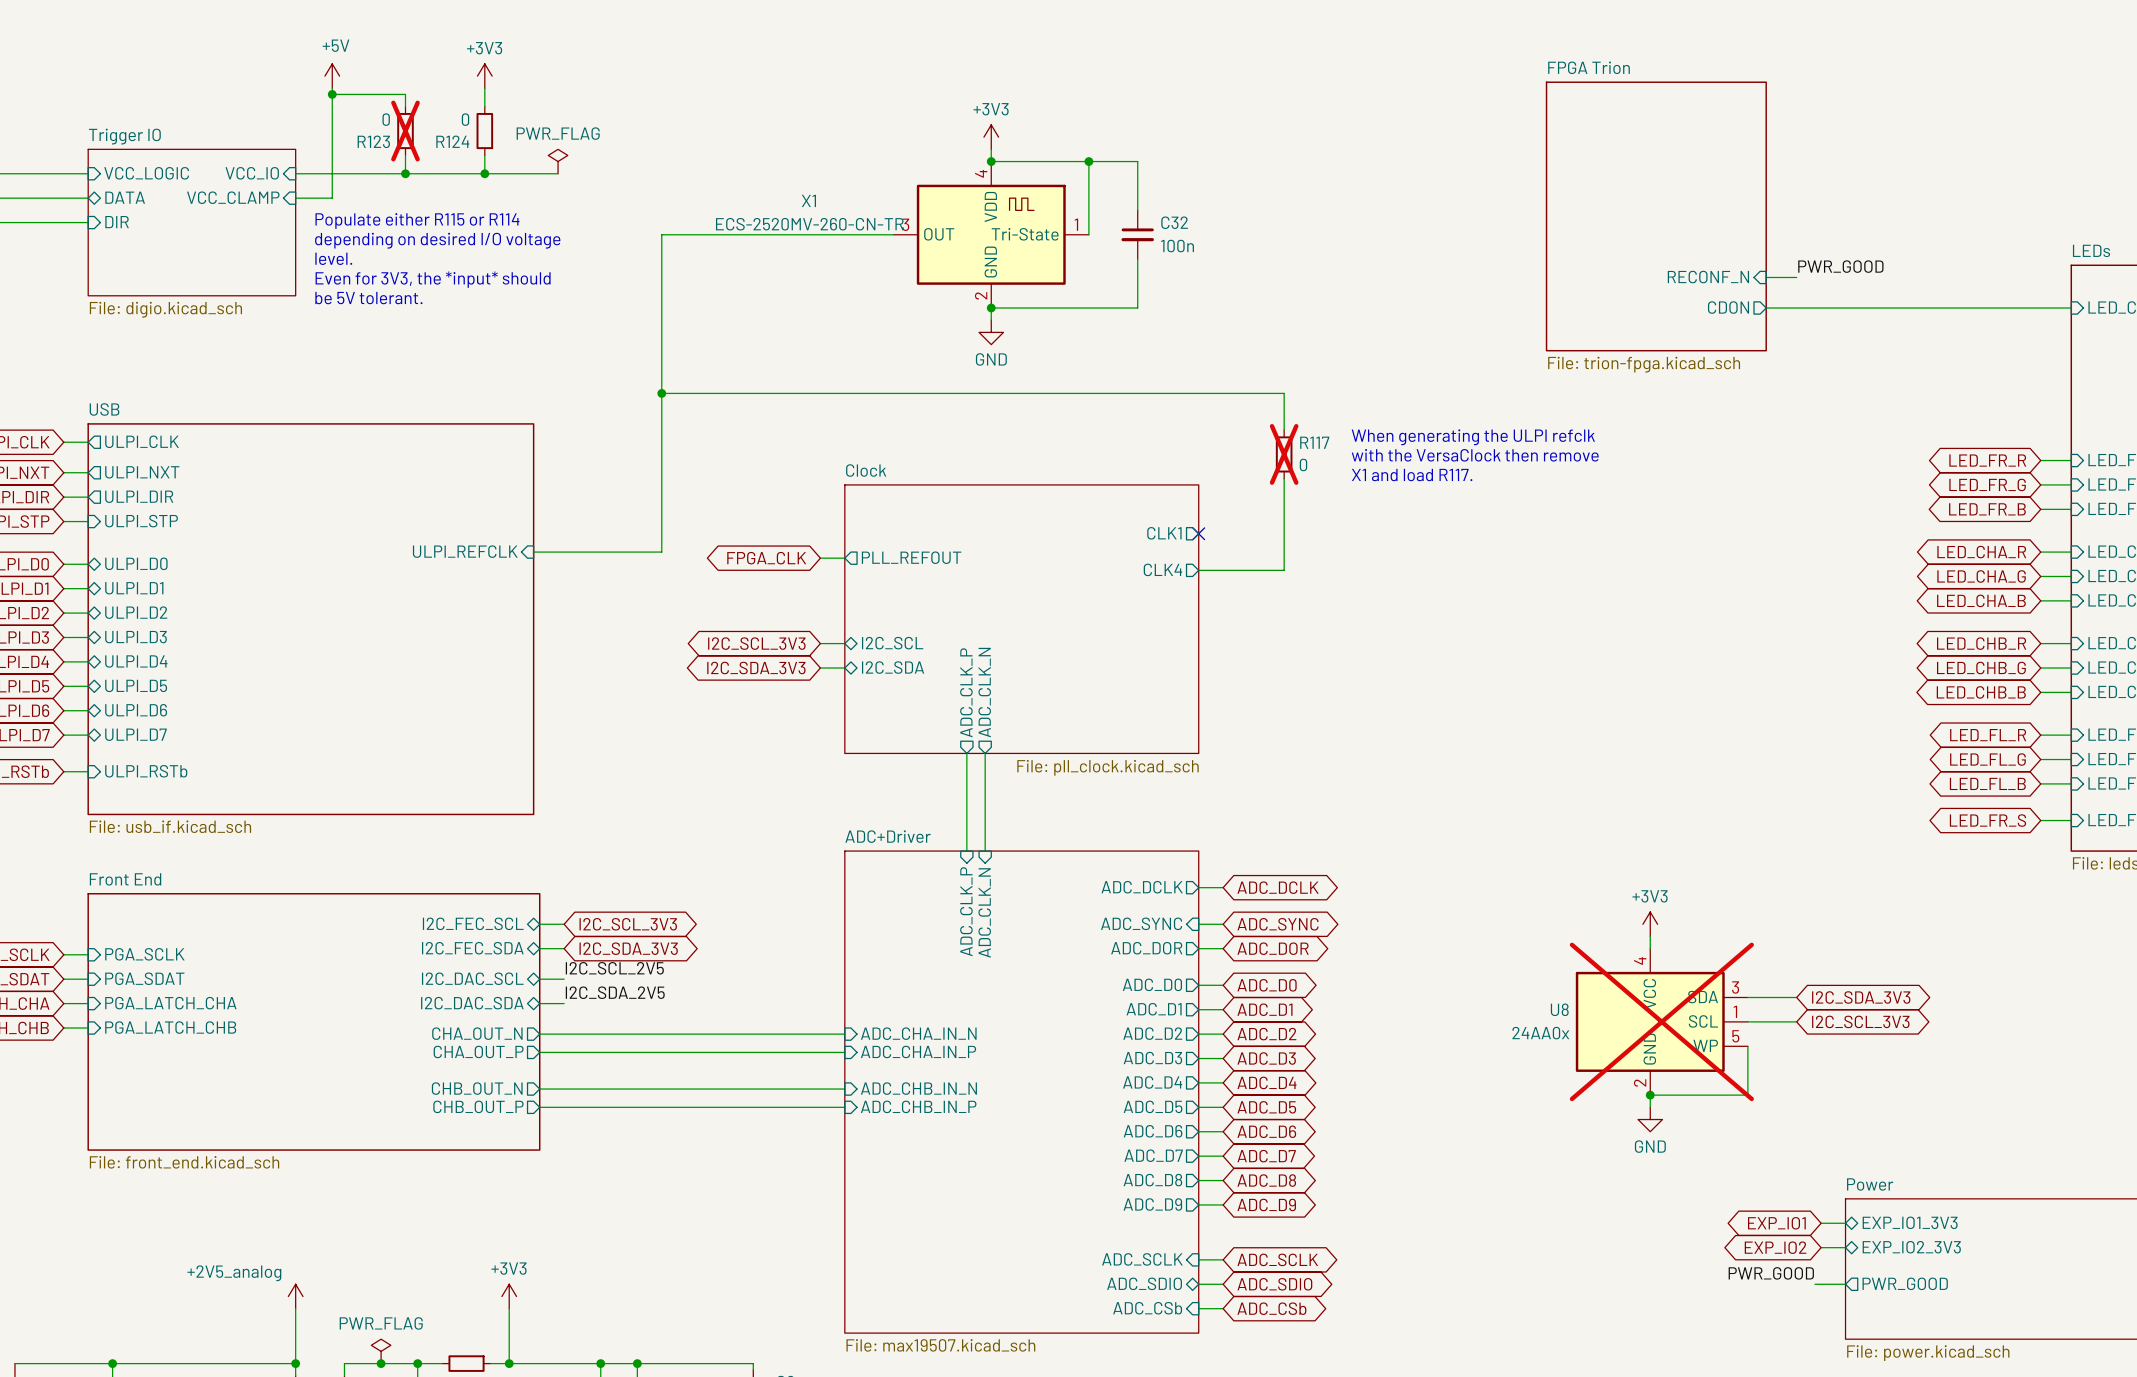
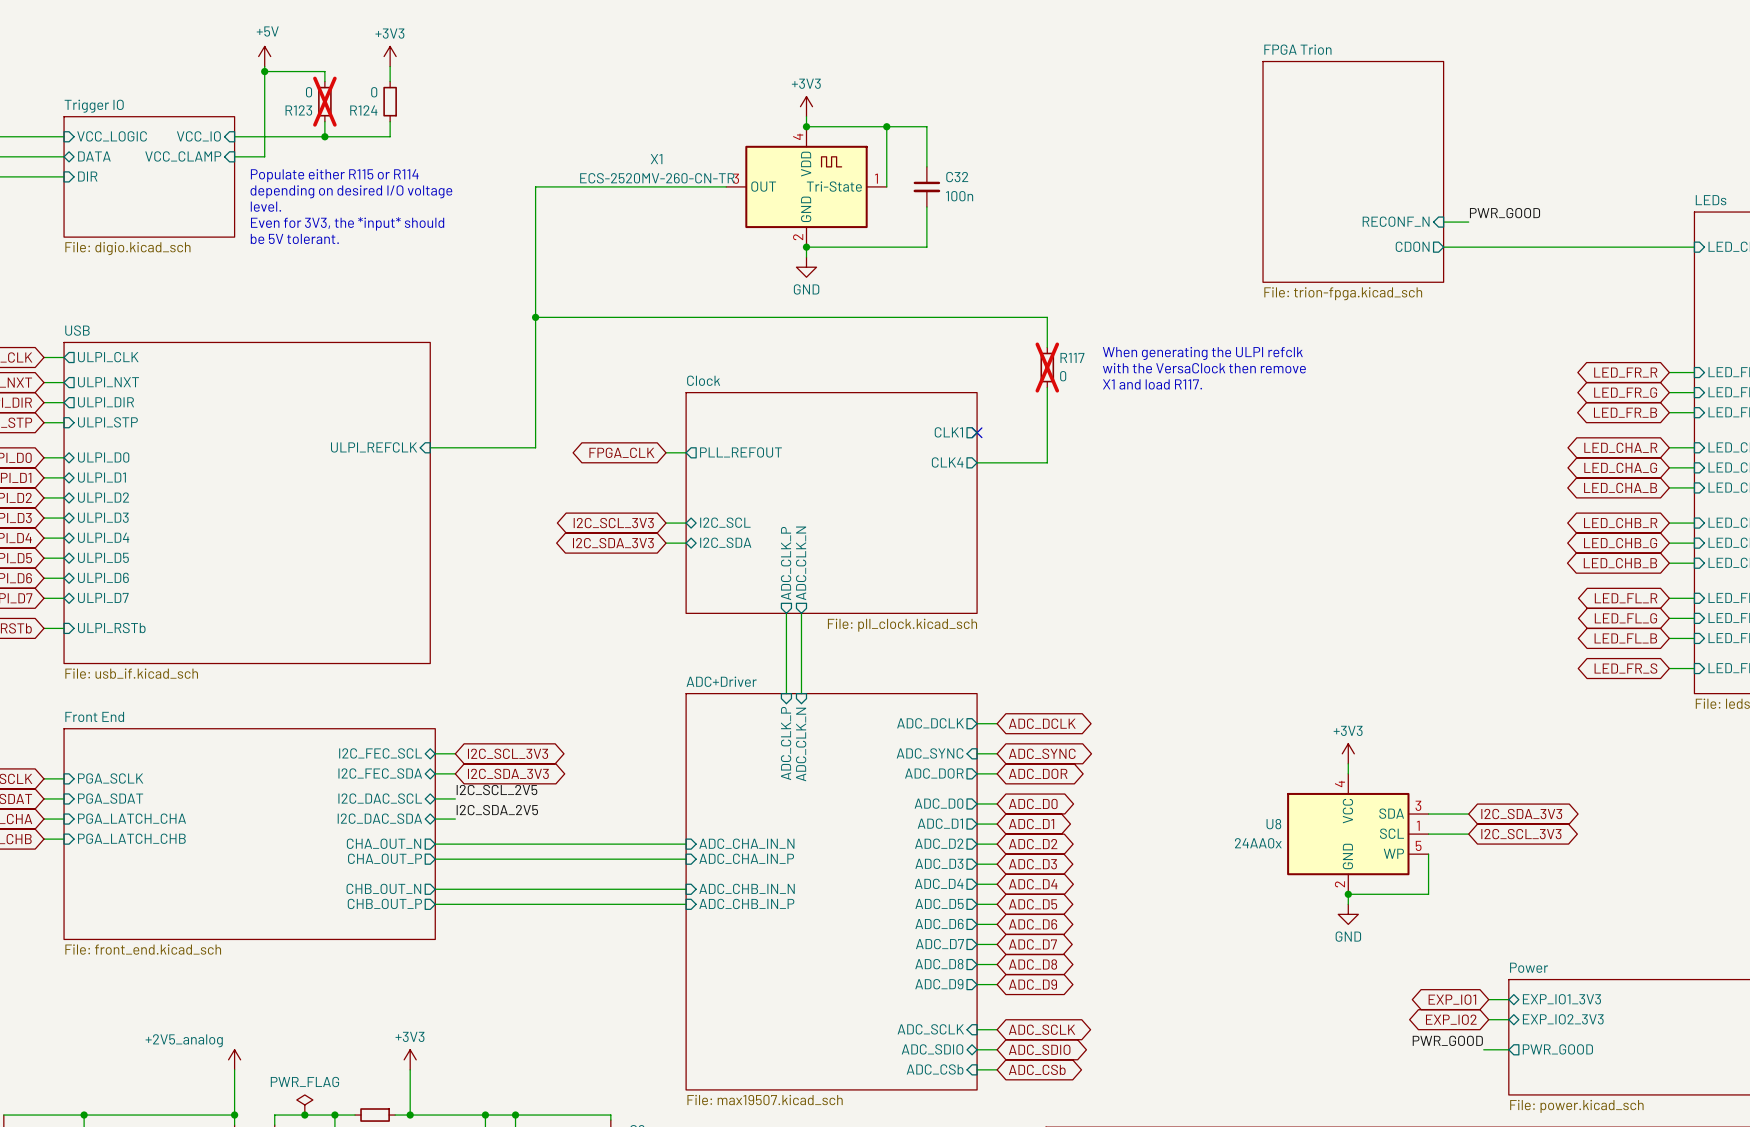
power symbol: PWR_FLAG (558, 161) -> none
wire: (484, 173) (558, 173) -> none
junction: (484, 173) -> none
U8 do-not-place cross: (1661, 1021) -> none

